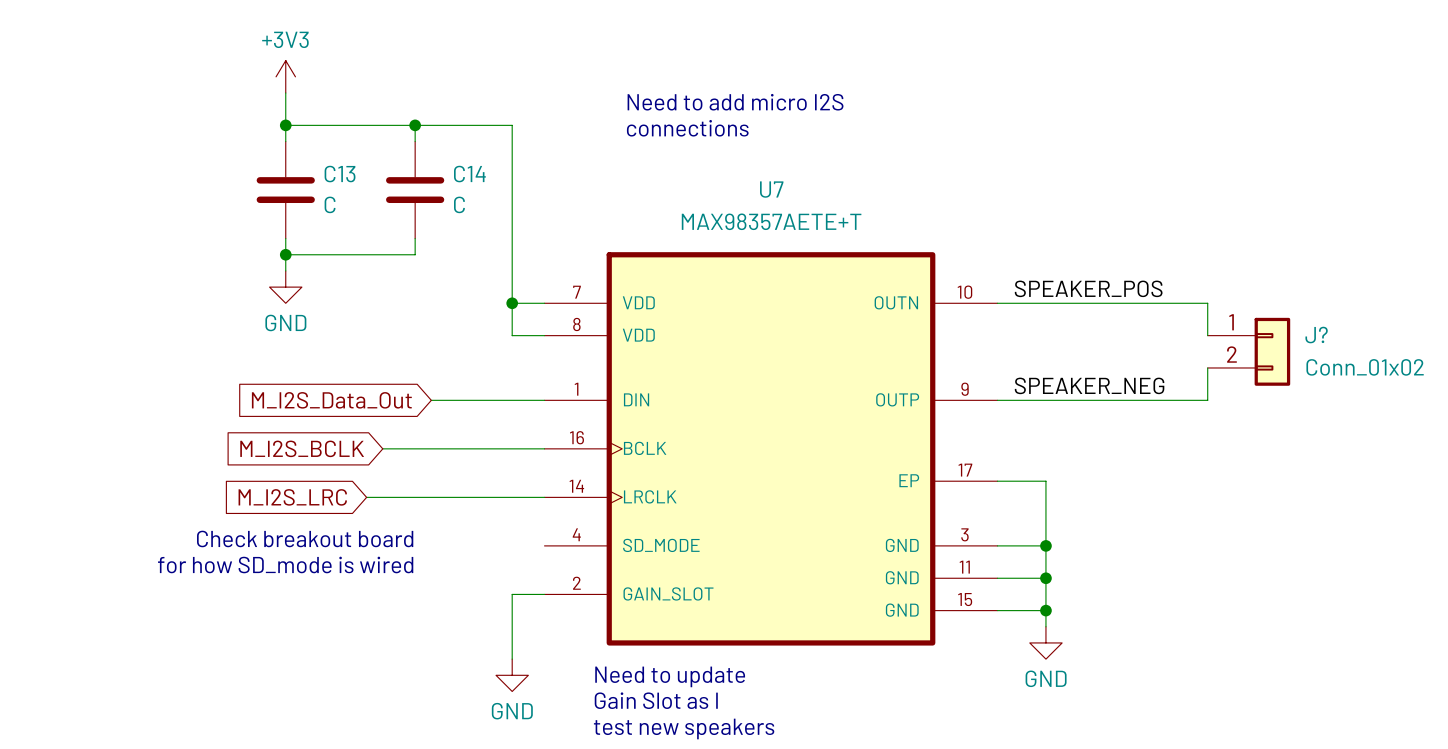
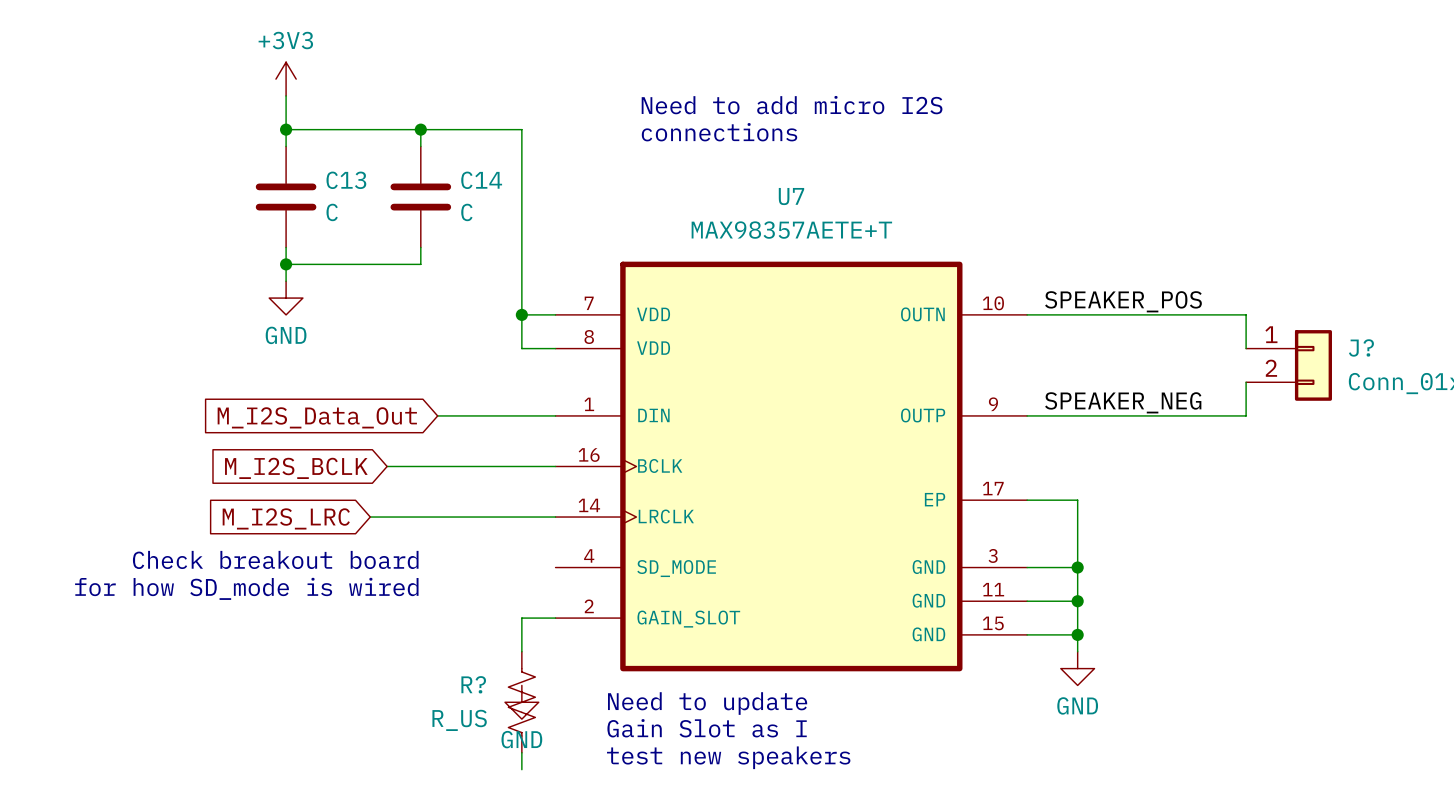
R?: none -> R_US (521, 702)
wire: none -> (521, 752) (521, 769)

